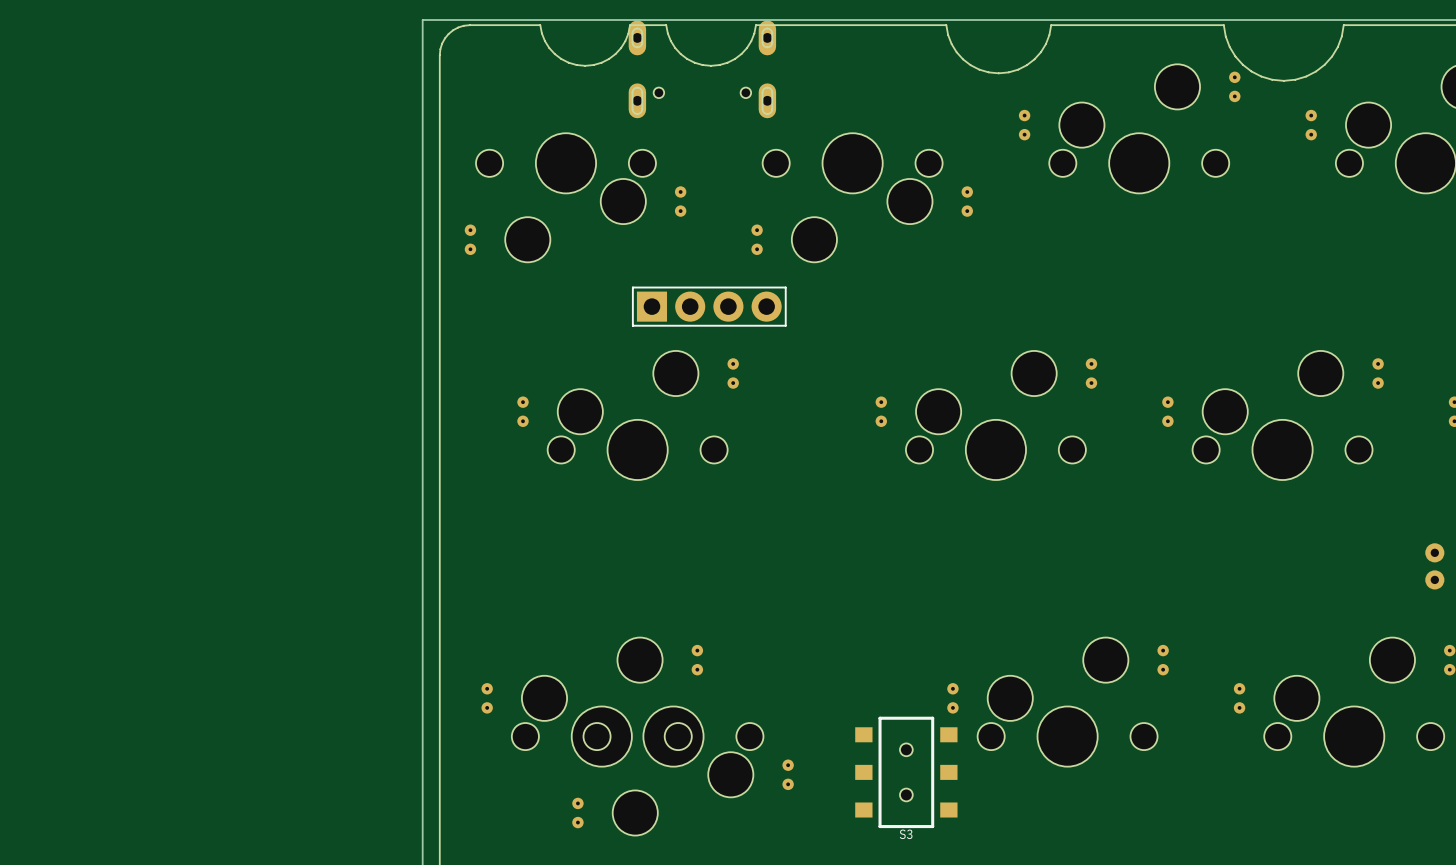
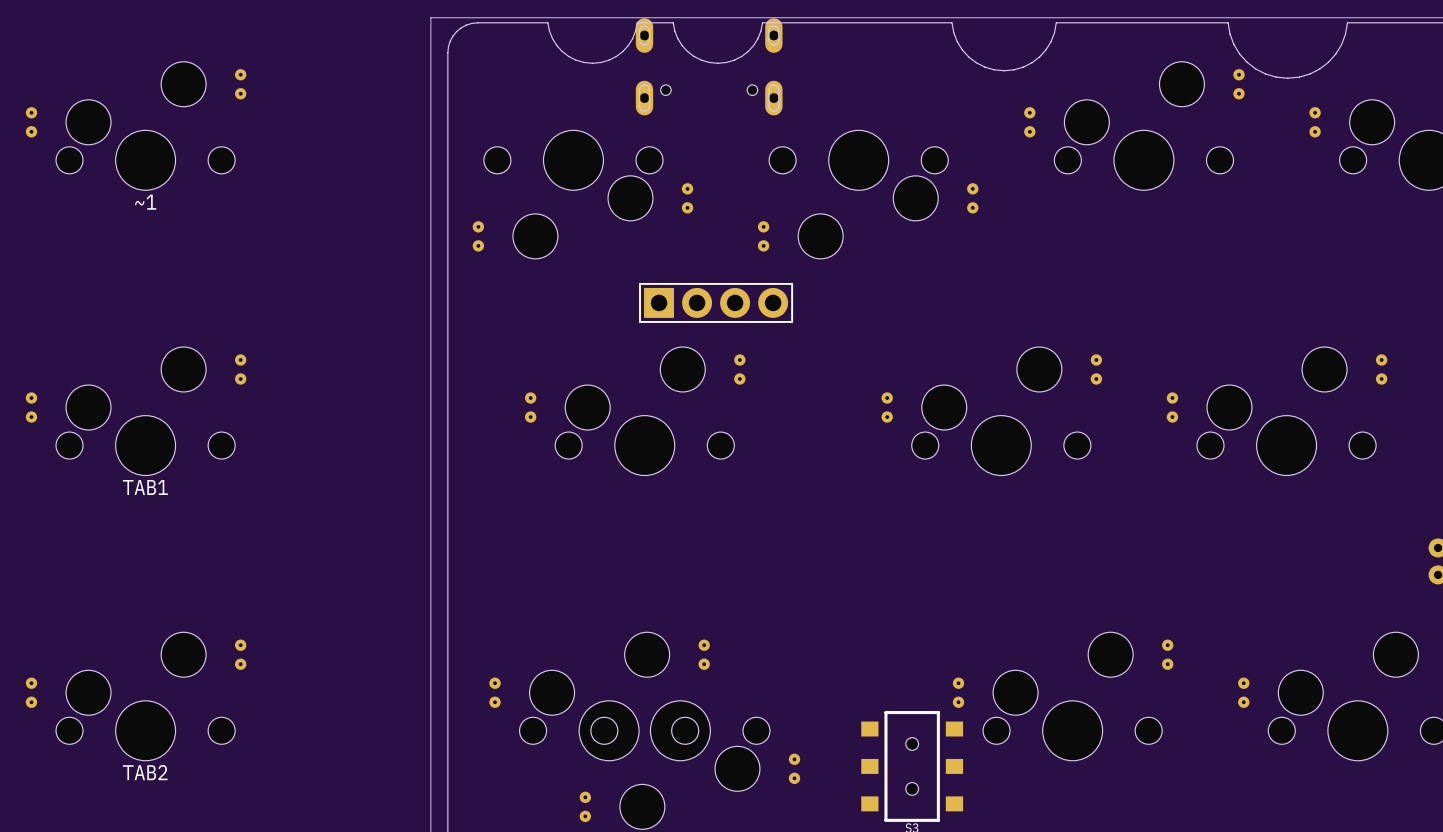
~1: none -> (136, 126)
TAB1: none -> (136, 411)
TAB2: none -> (136, 696)

